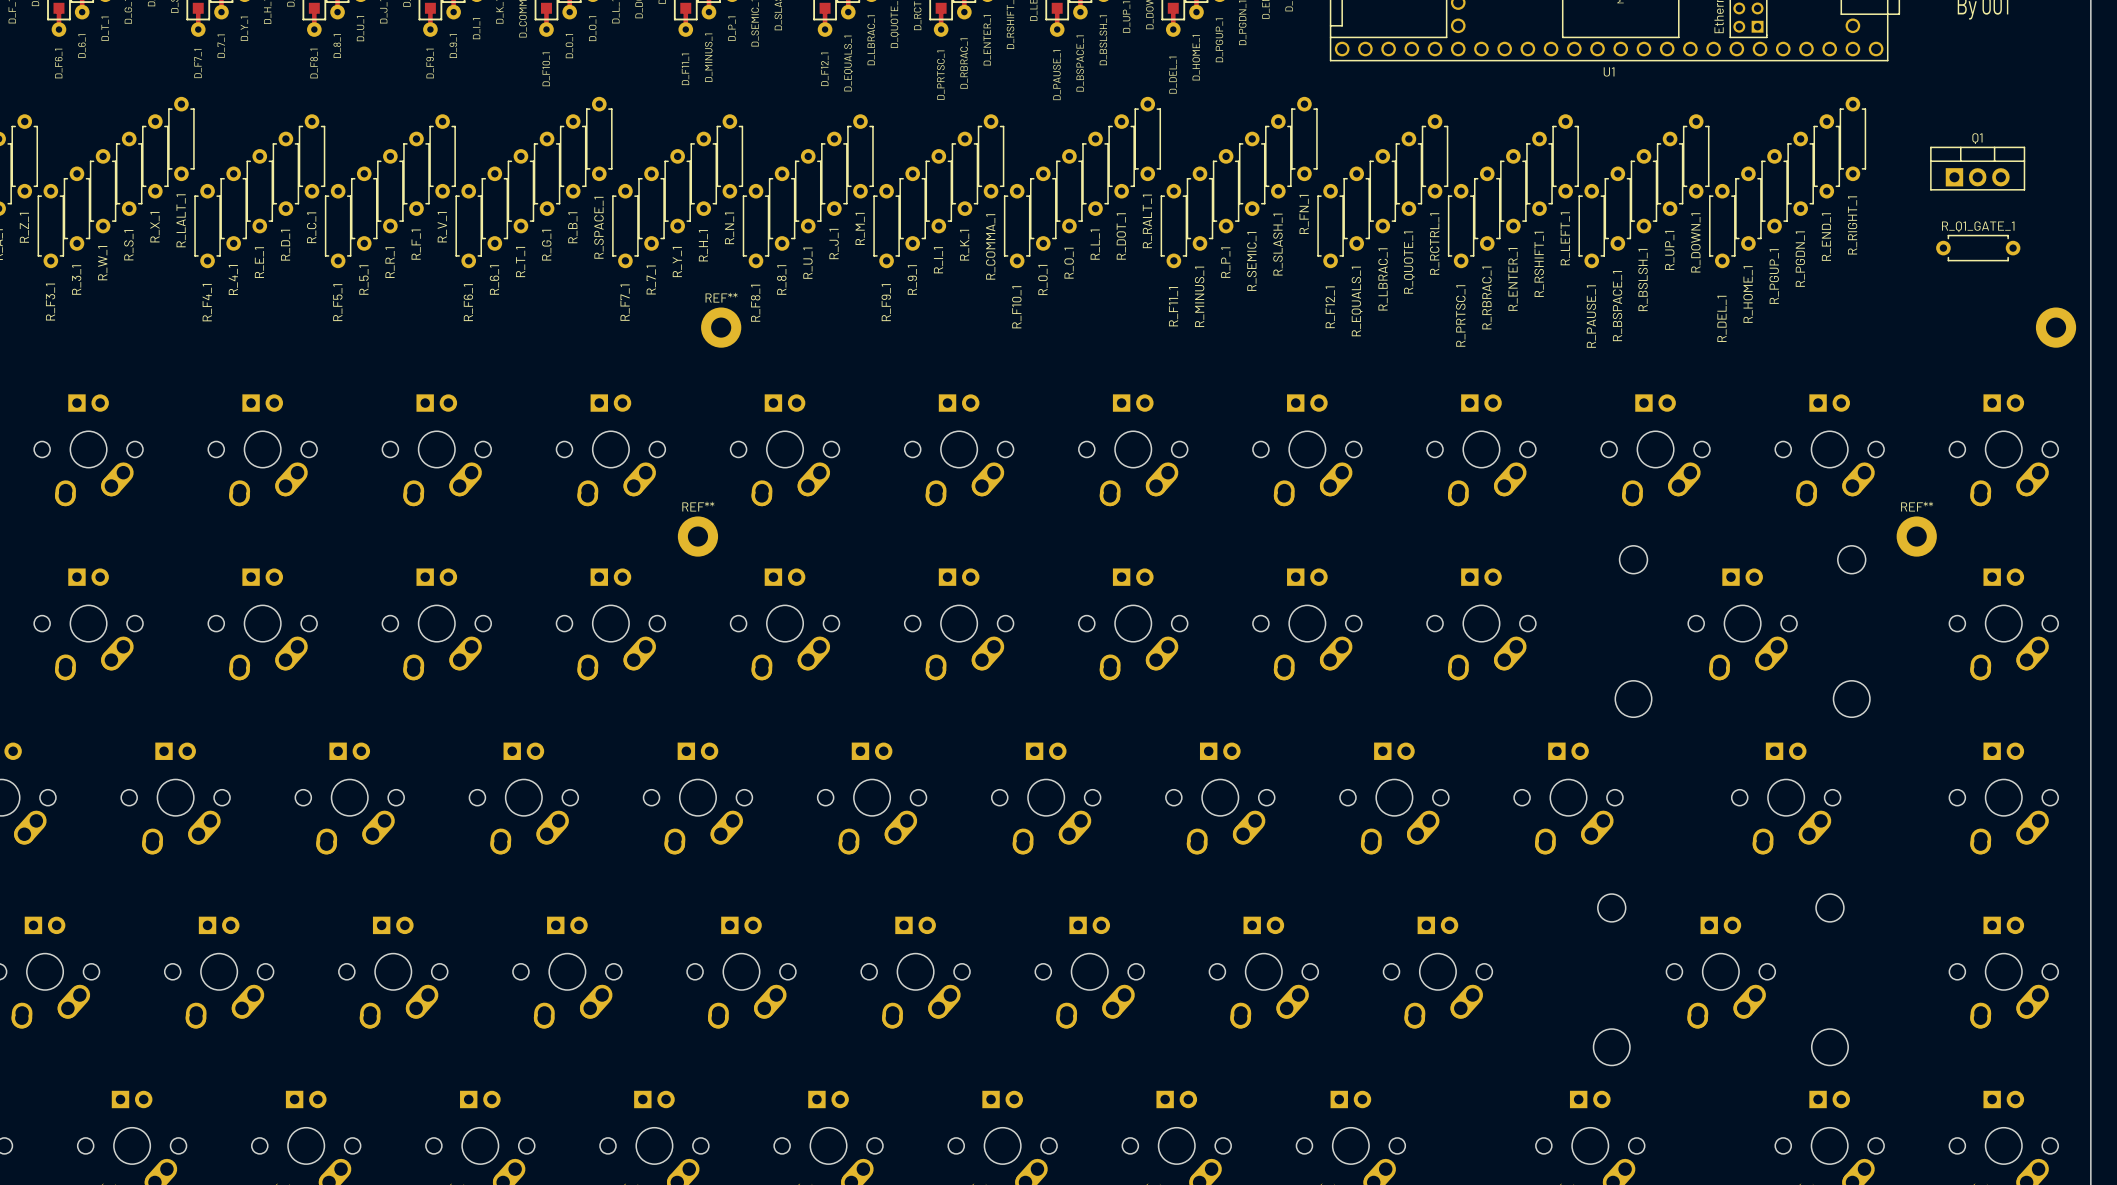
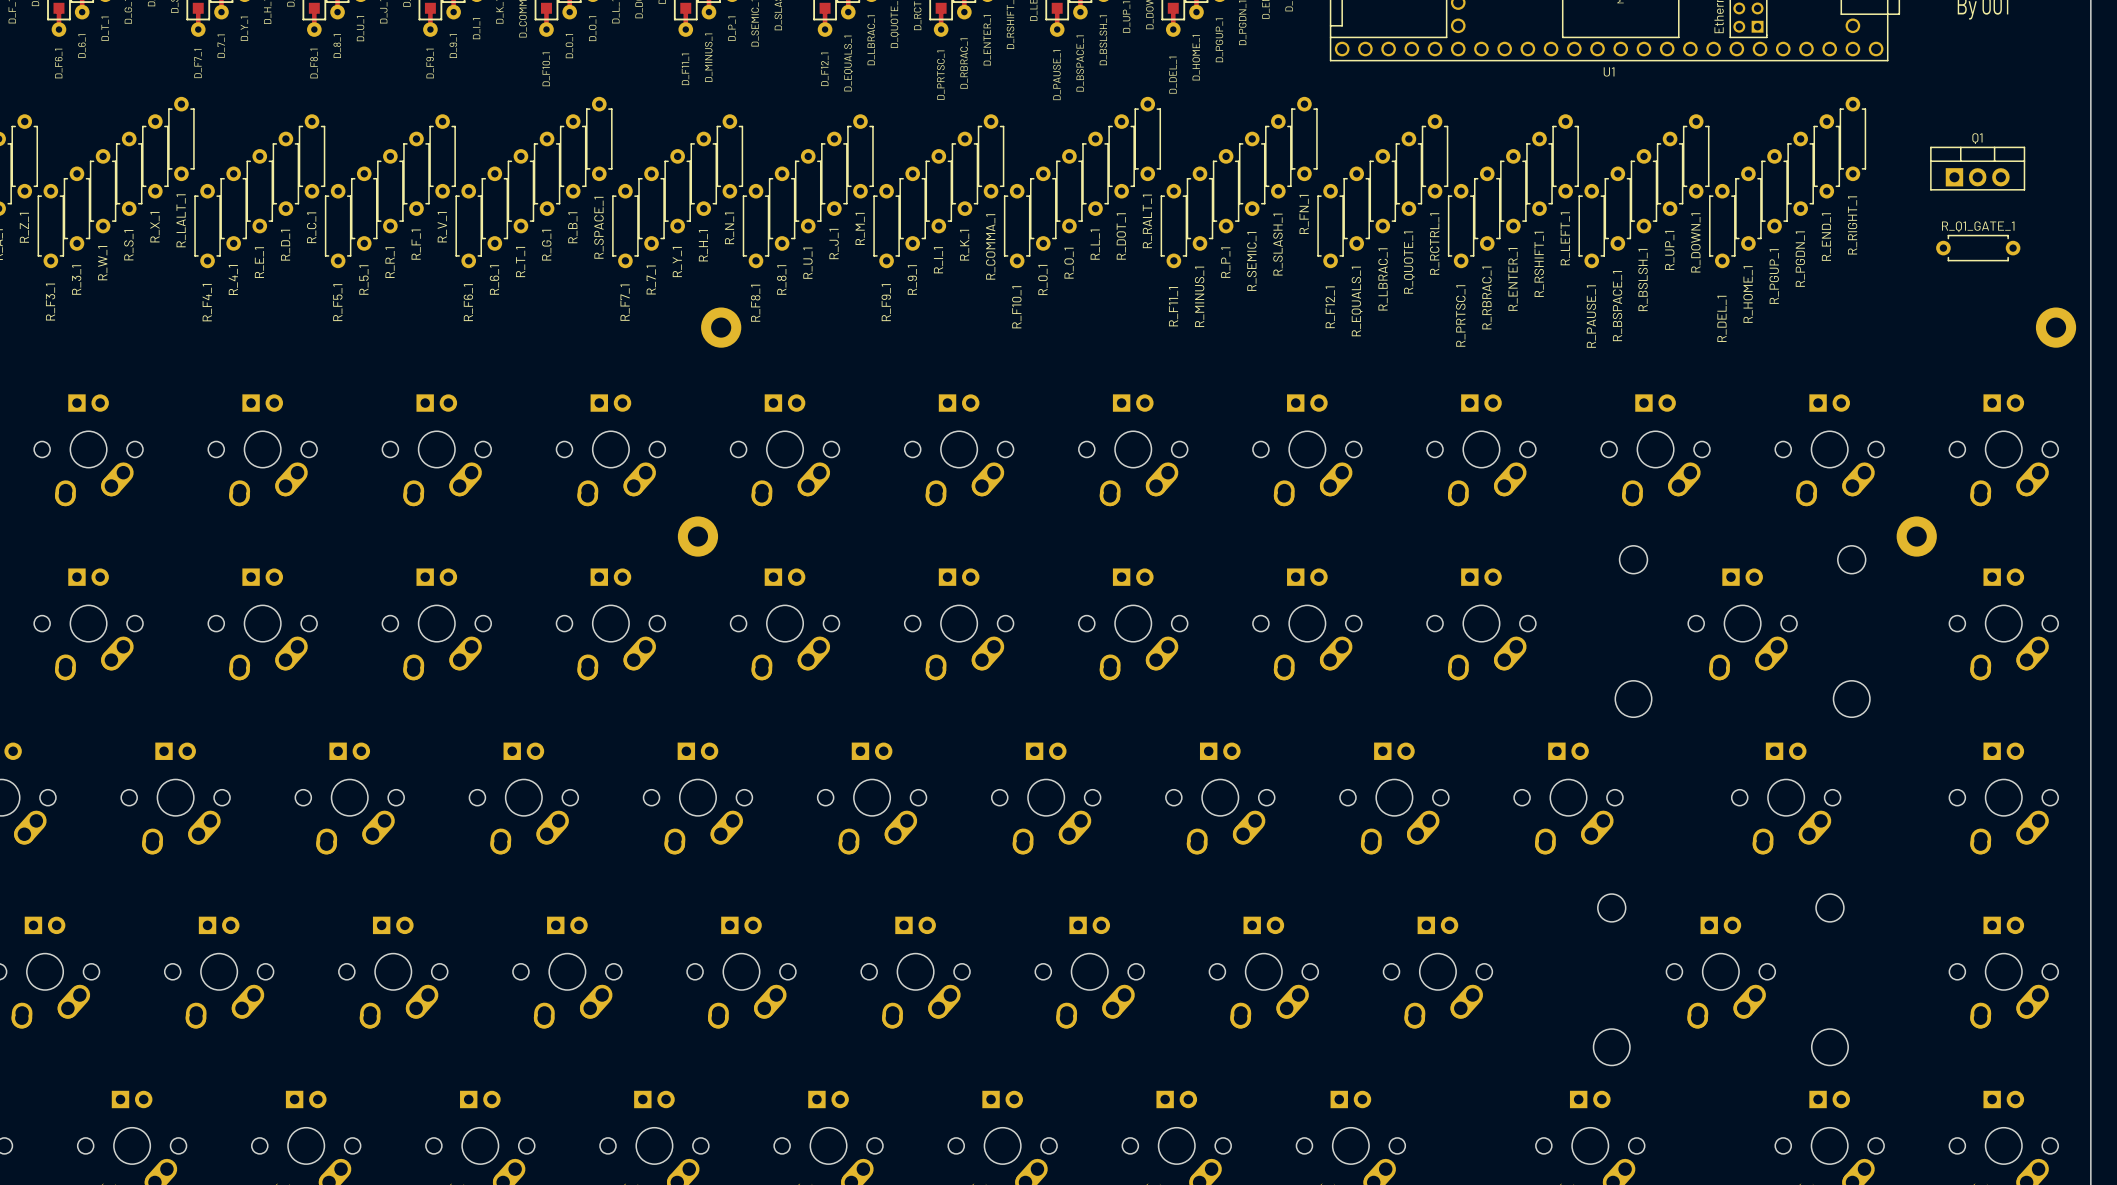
REF** name: REF** (721, 297) -> none
REF** name: REF** (698, 506) -> none
REF** name: REF** (1917, 506) -> none

